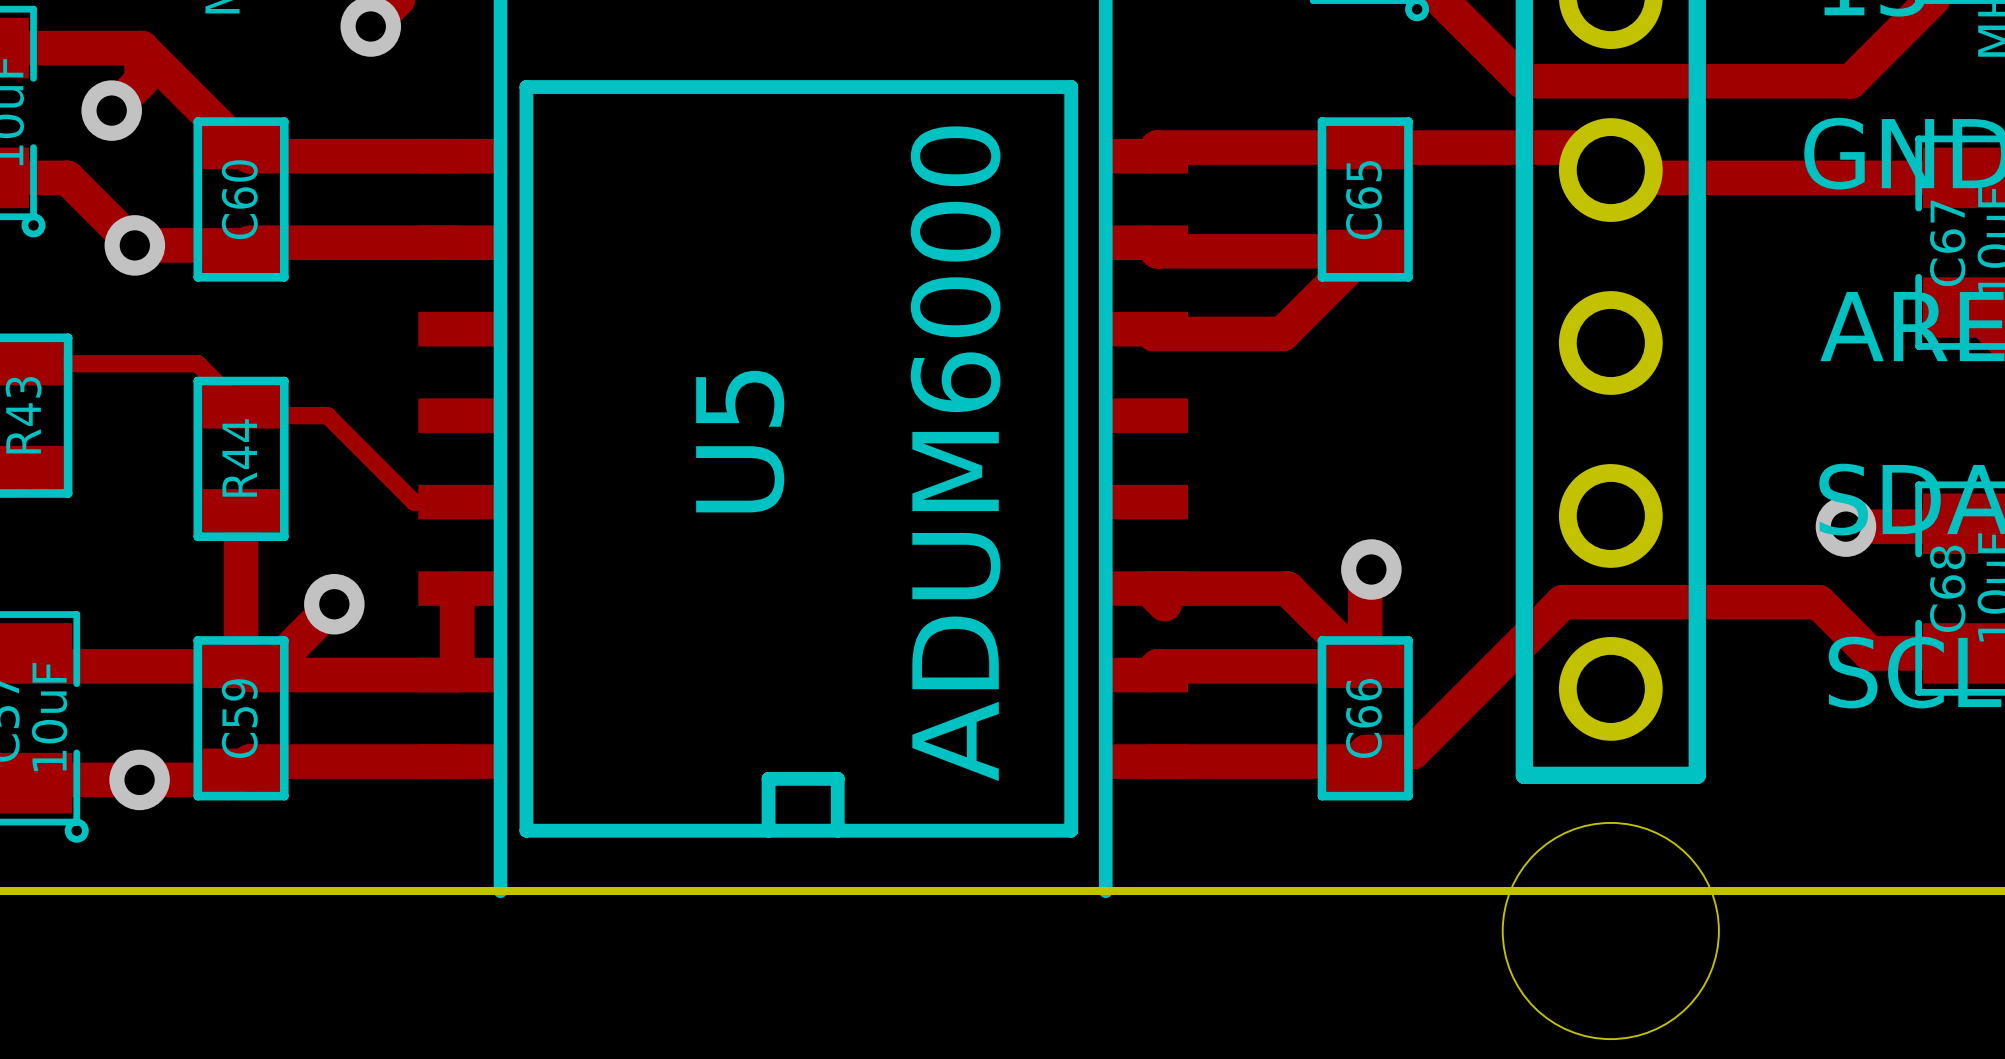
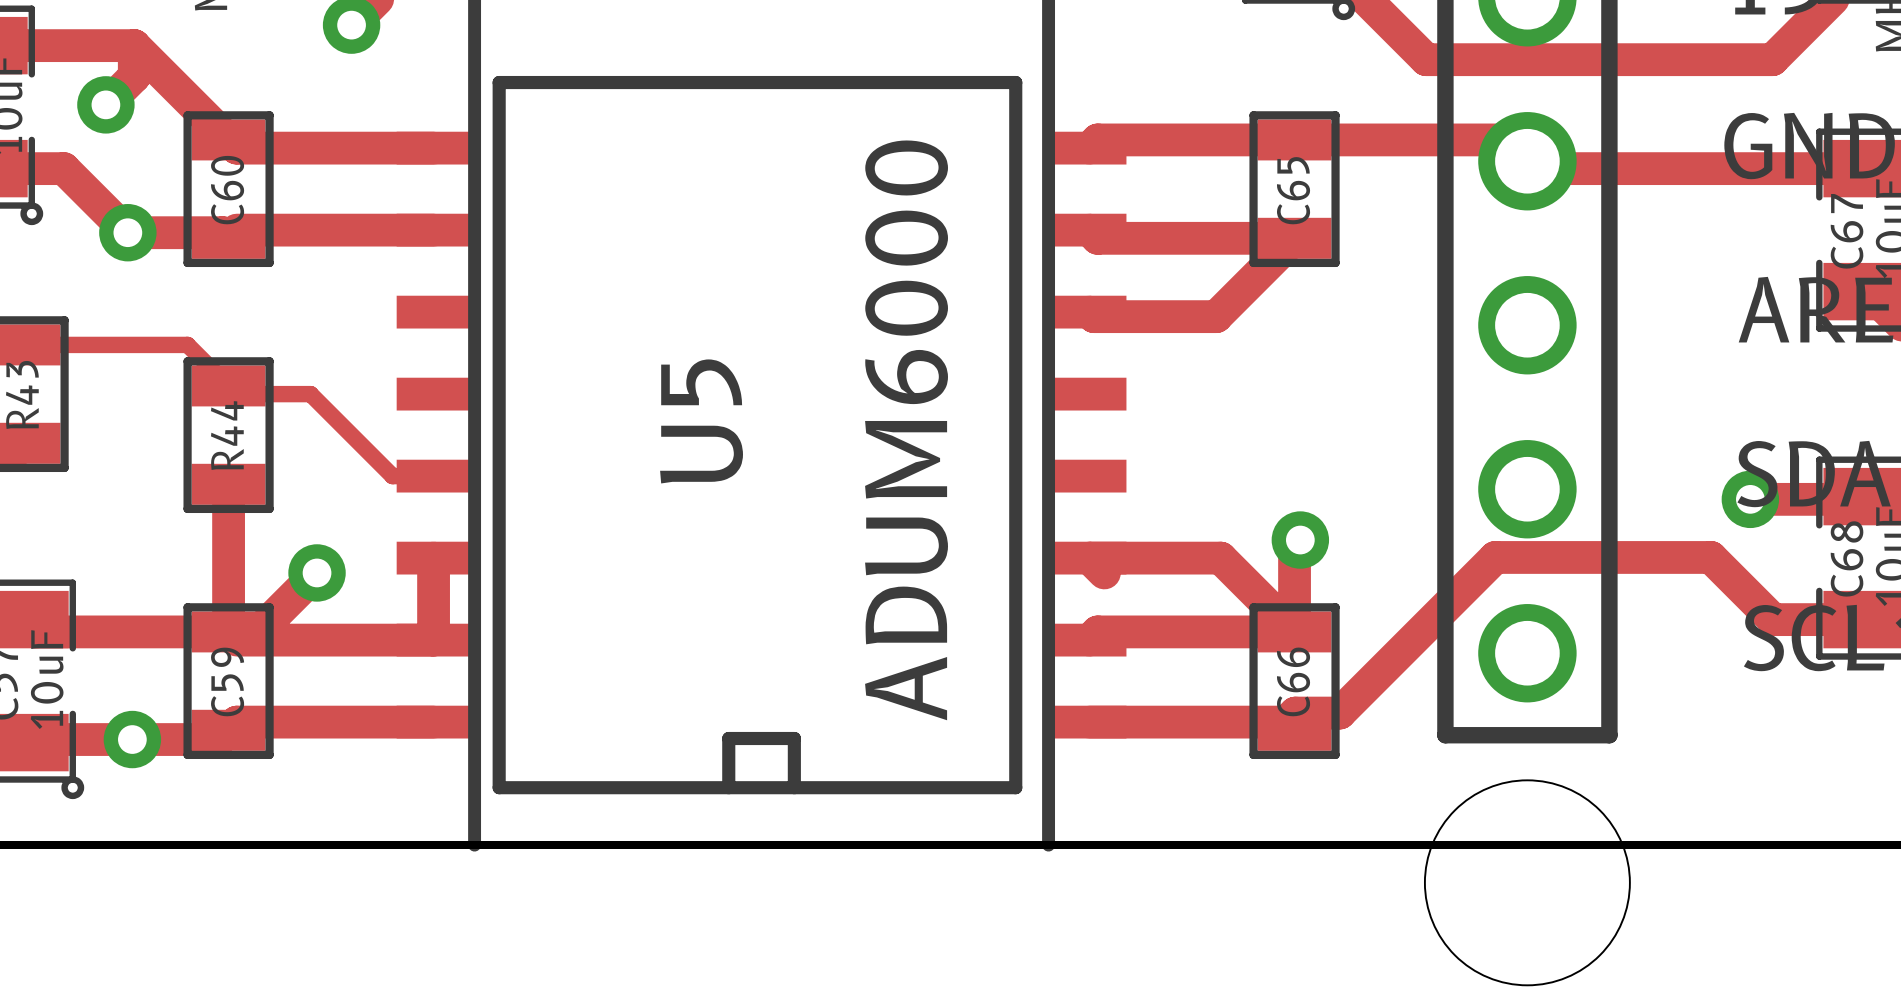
track: (1504, 62) (1522, 81) (1850, 81) (1869, 62) -> (1426, 59) (1772, 59)
track: (1562, 602) (1818, 602) -> (1481, 571) (1495, 557) (1710, 557) (1724, 571)

